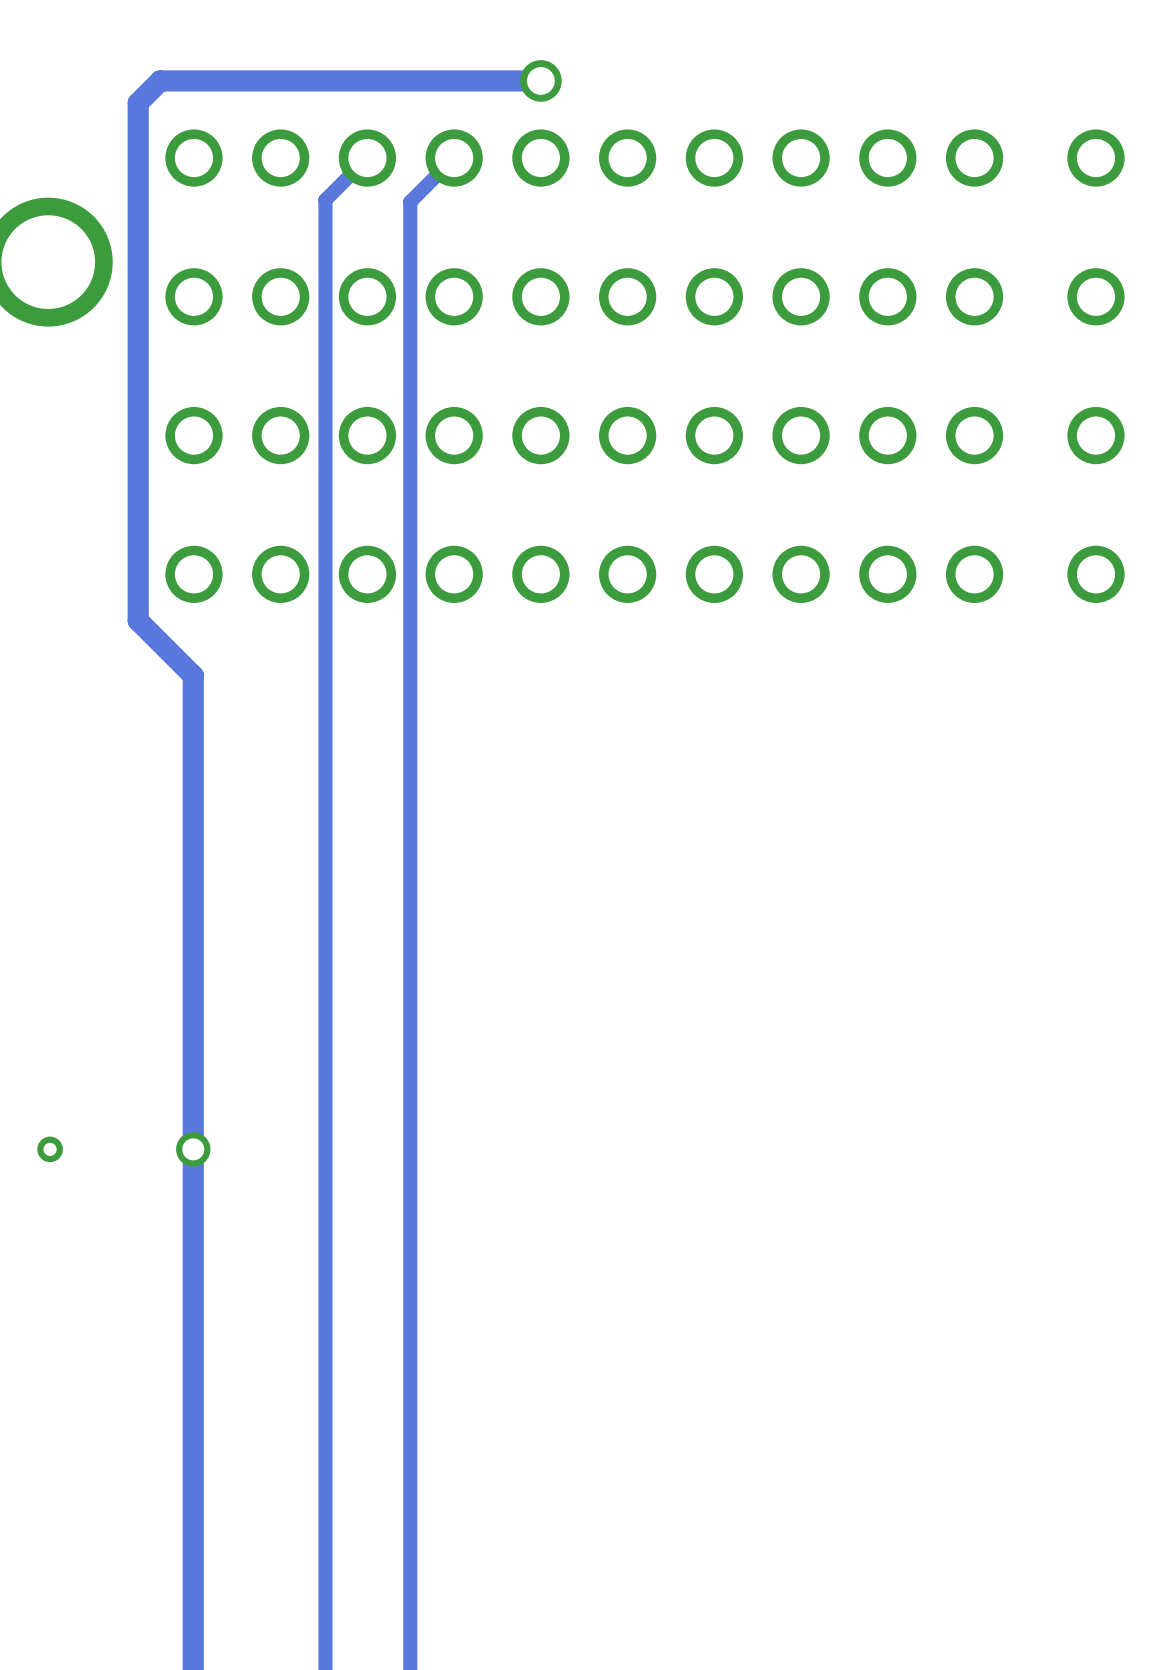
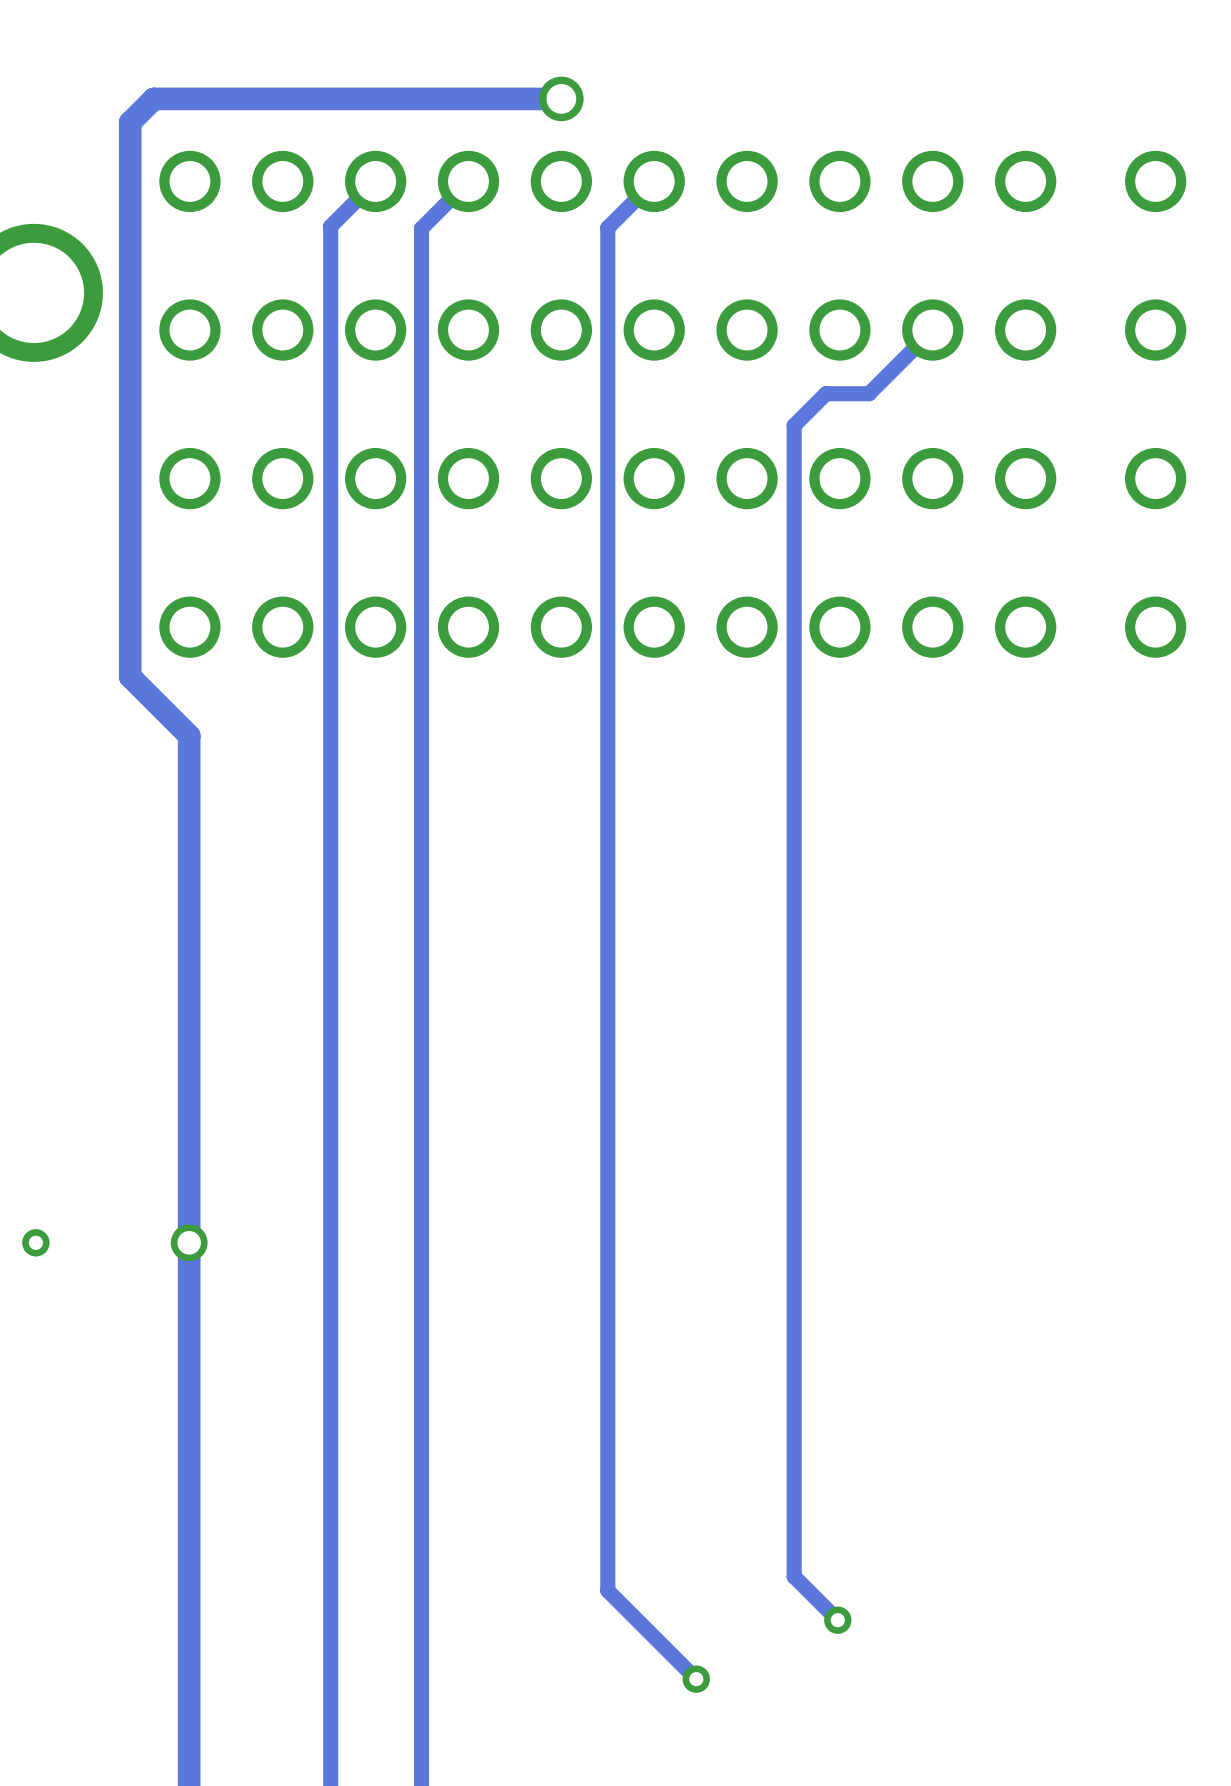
track: none -> (654, 181) (607, 227) (607, 1590) (696, 1679)
track: none -> (932, 330) (869, 393) (826, 393) (794, 425) (794, 1576) (837, 1620)
via: none -> (837, 1620)
via: none -> (696, 1679)

